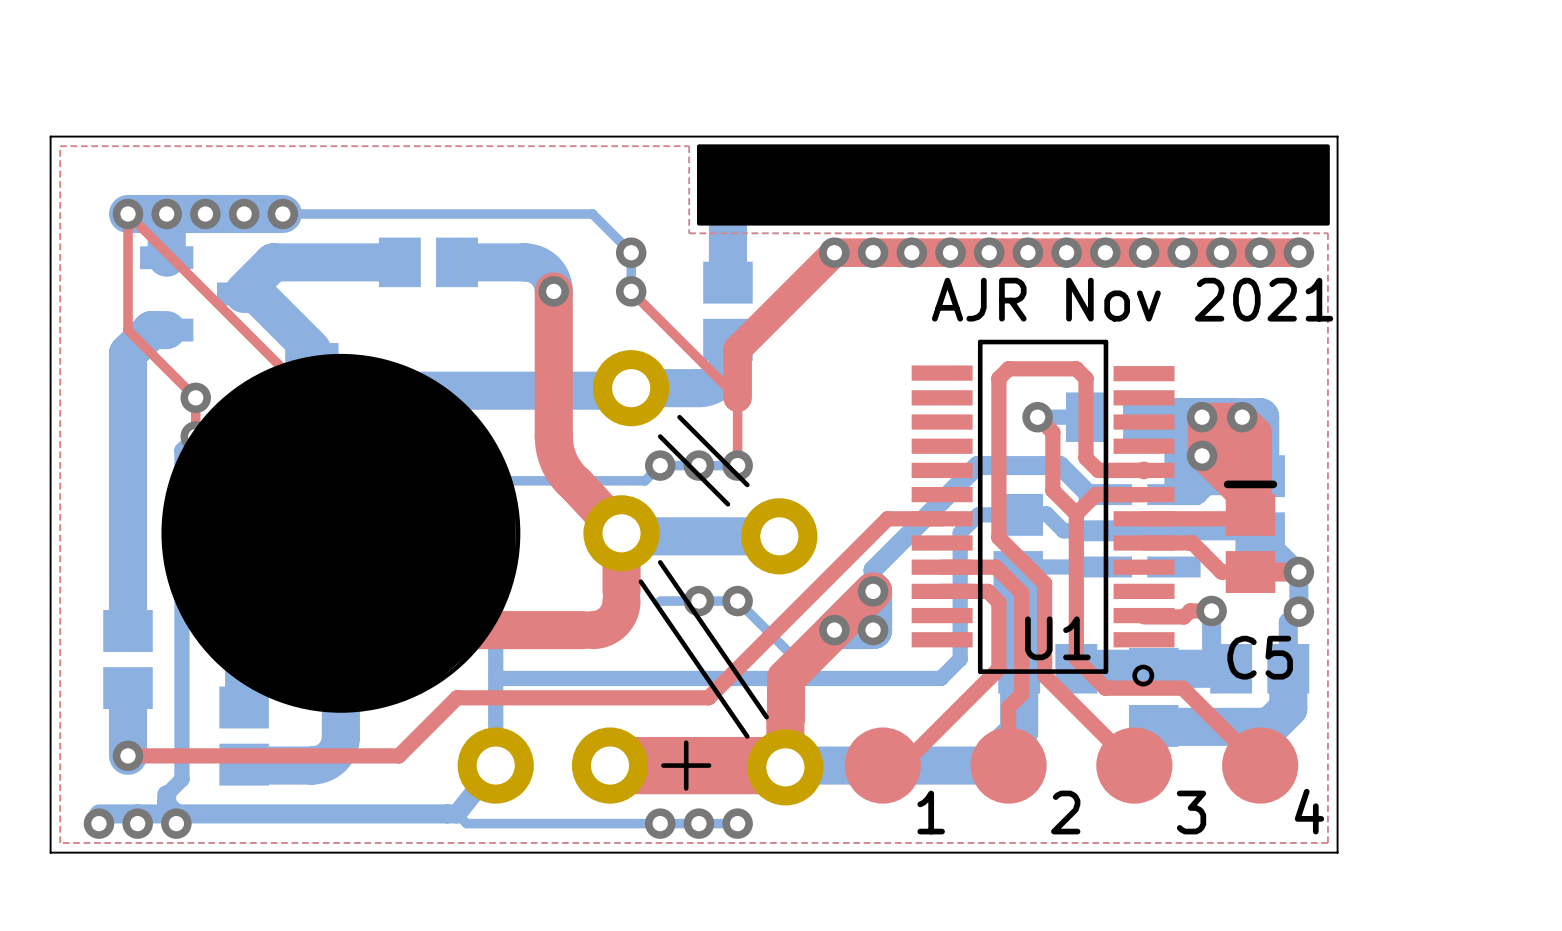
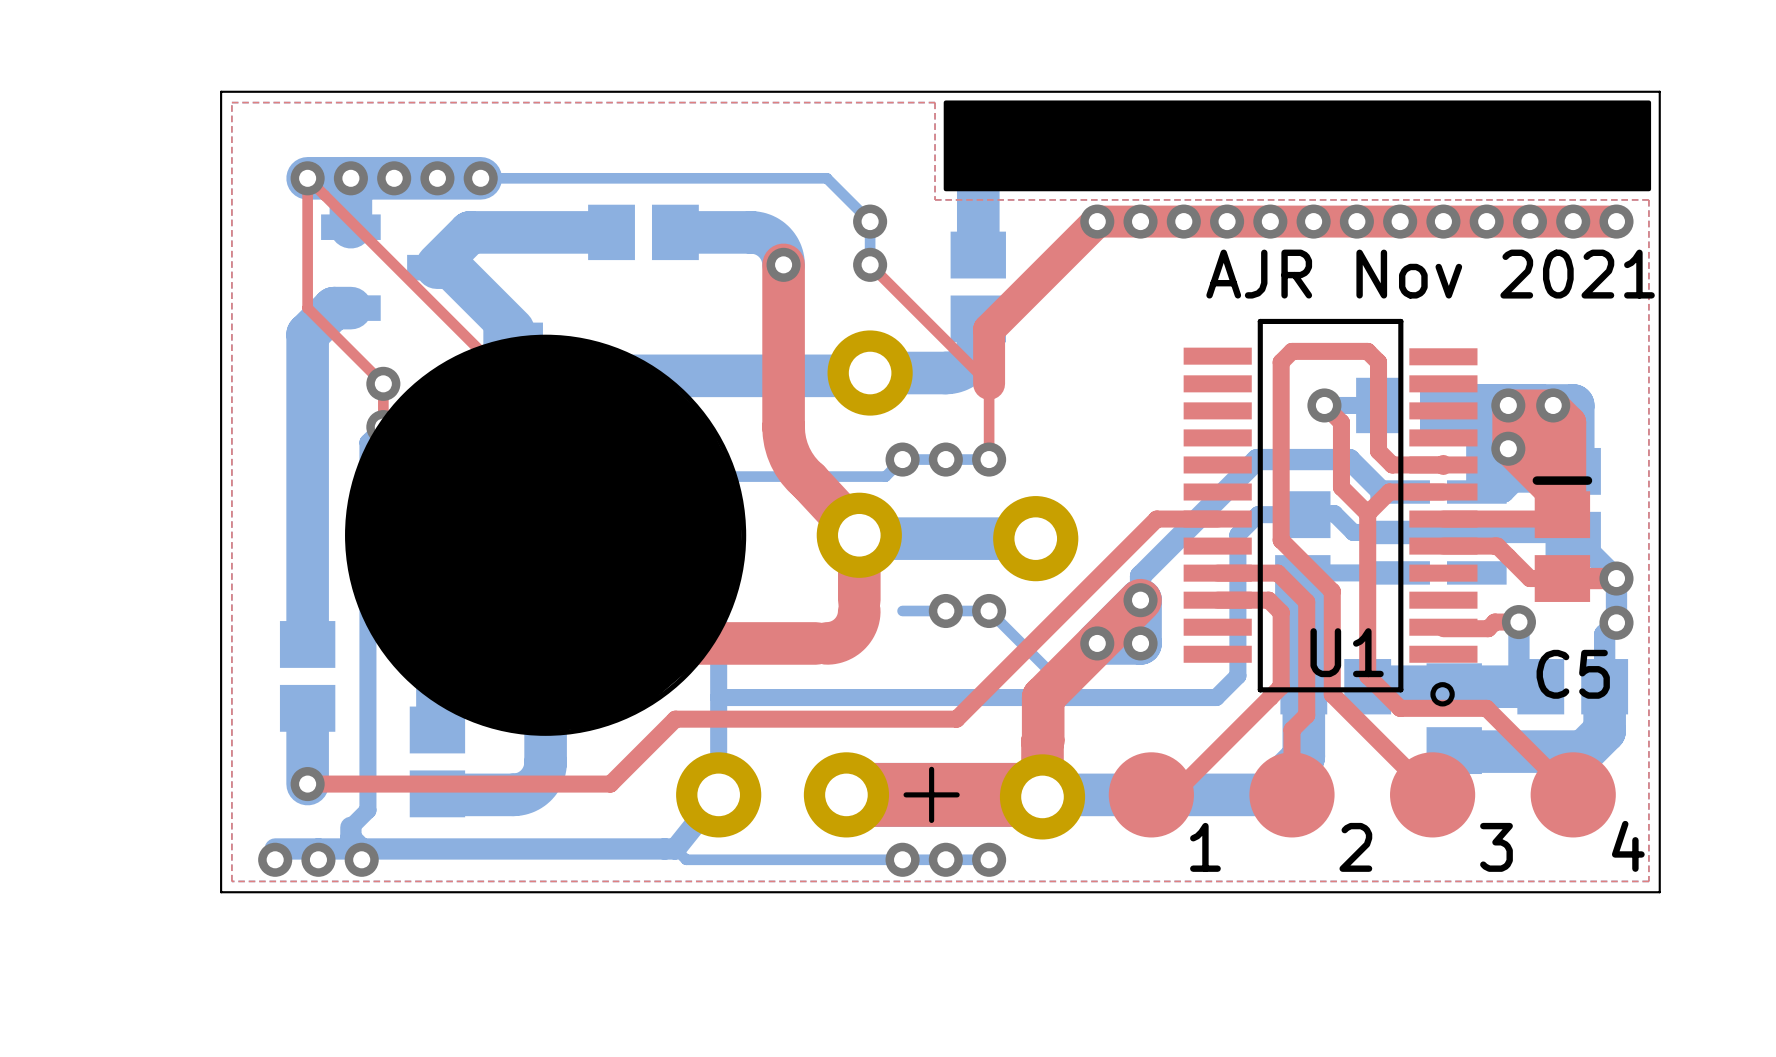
line: (679, 417) (747, 484) -> none
line: (660, 436) (727, 504) -> none
line: (660, 562) (766, 717) -> none
line: (640, 581) (747, 736) -> none

